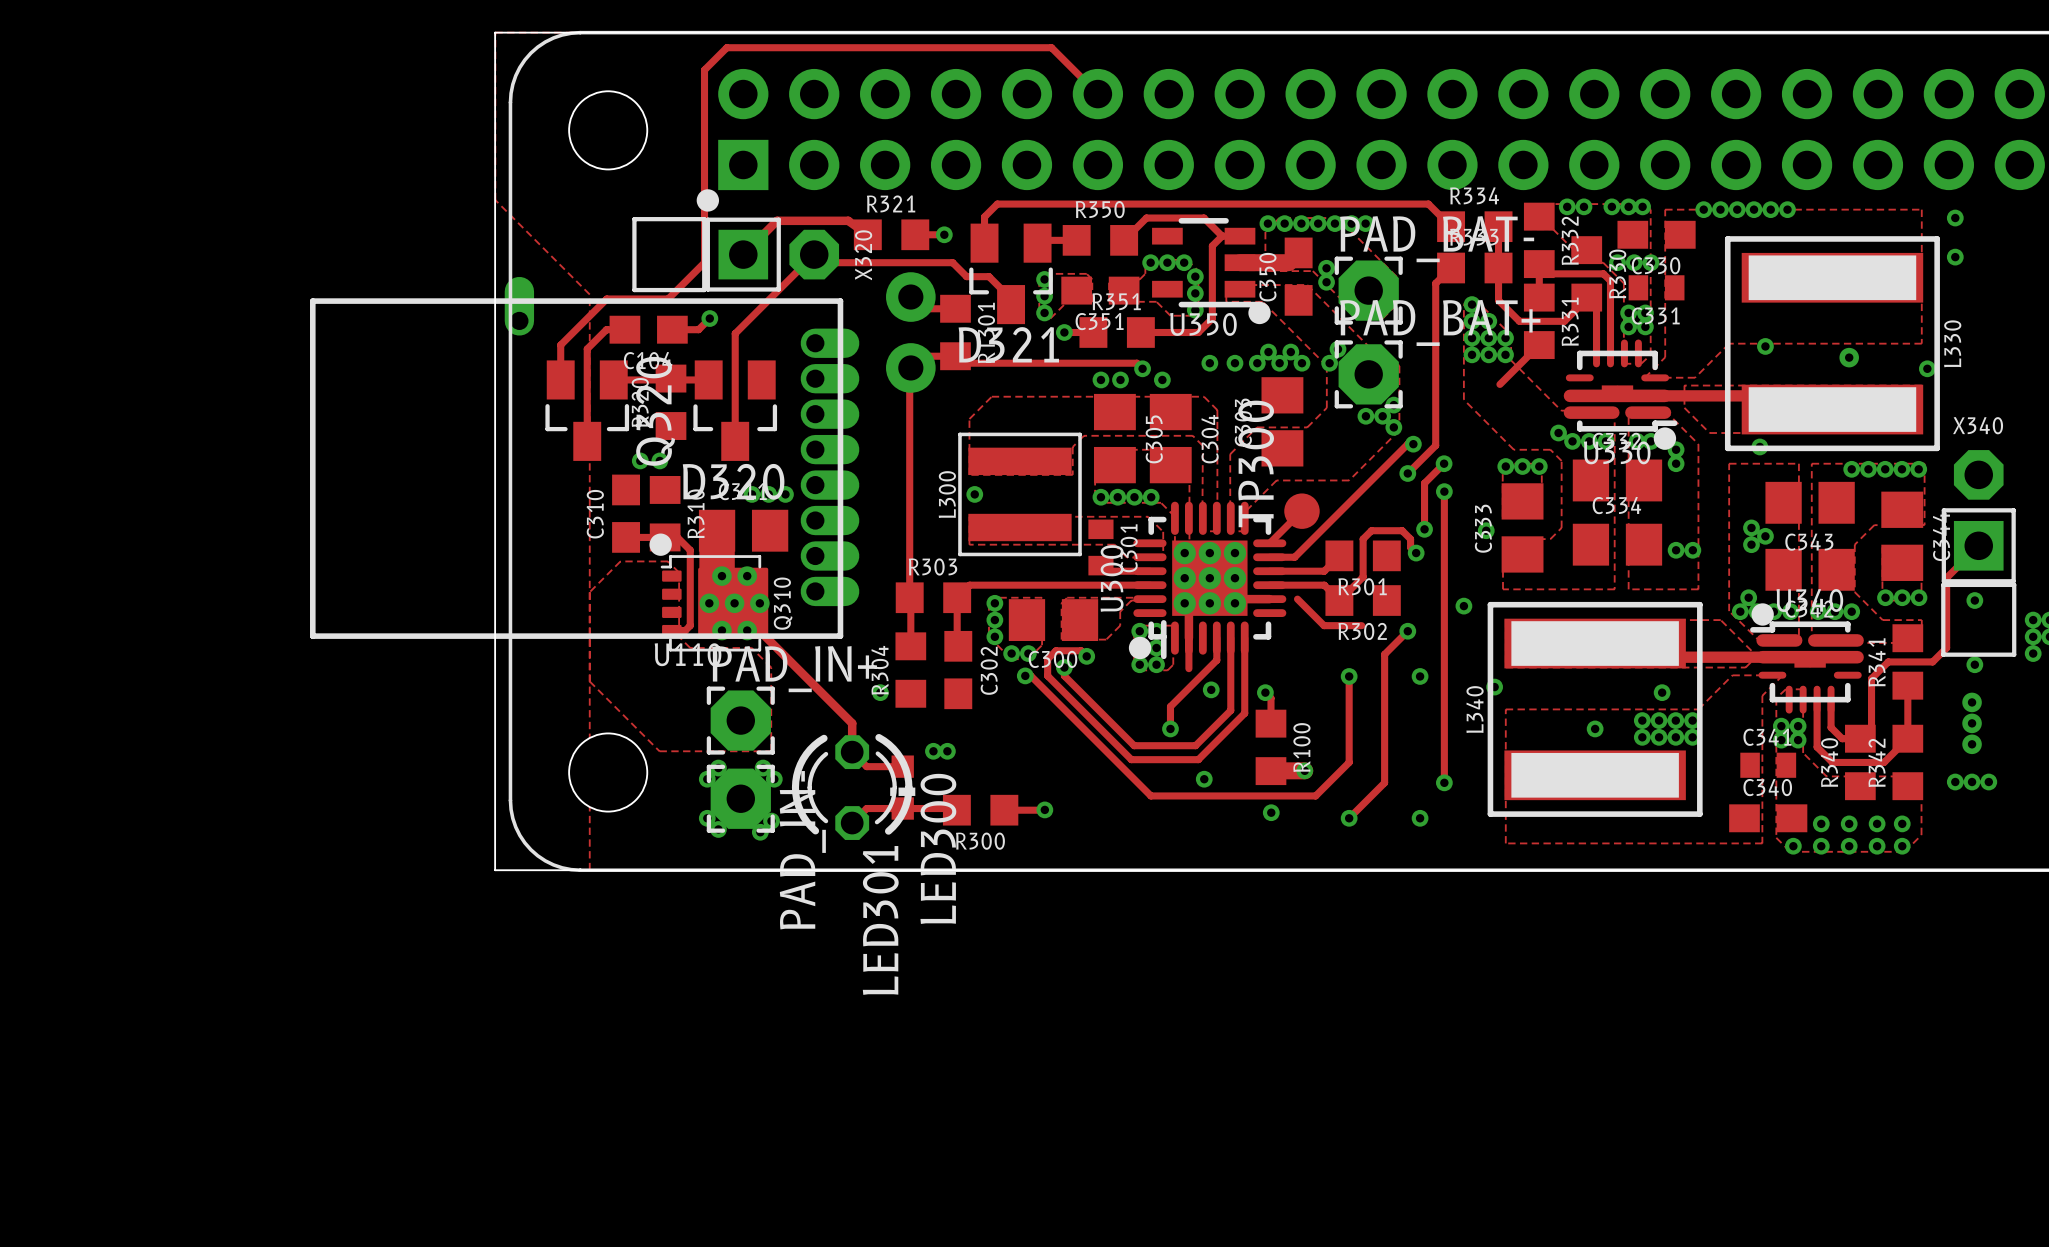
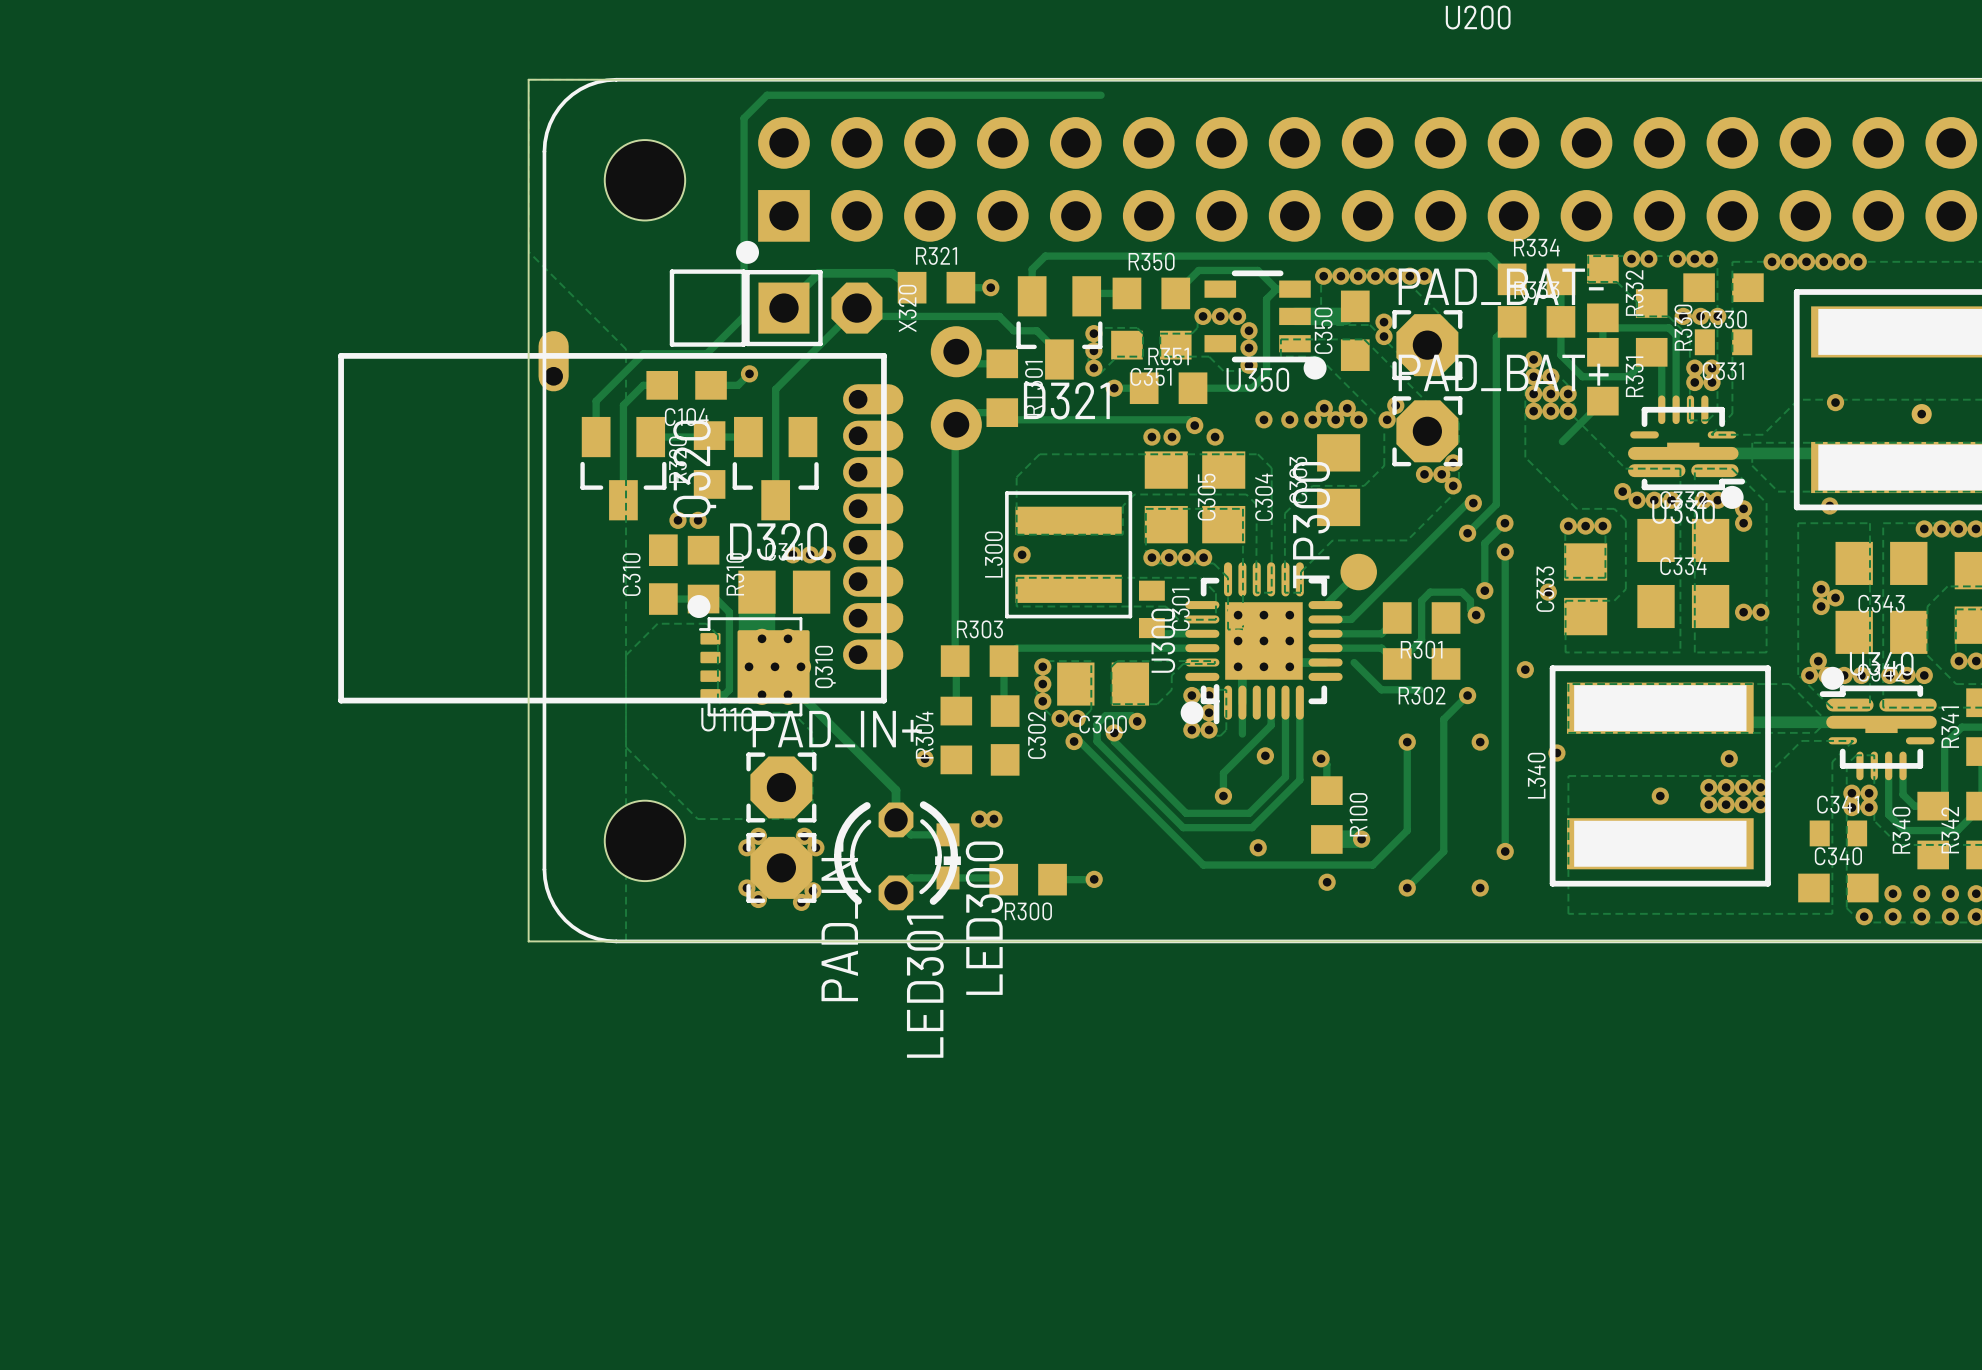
track: (1051, 47) (1097, 94) -> none

